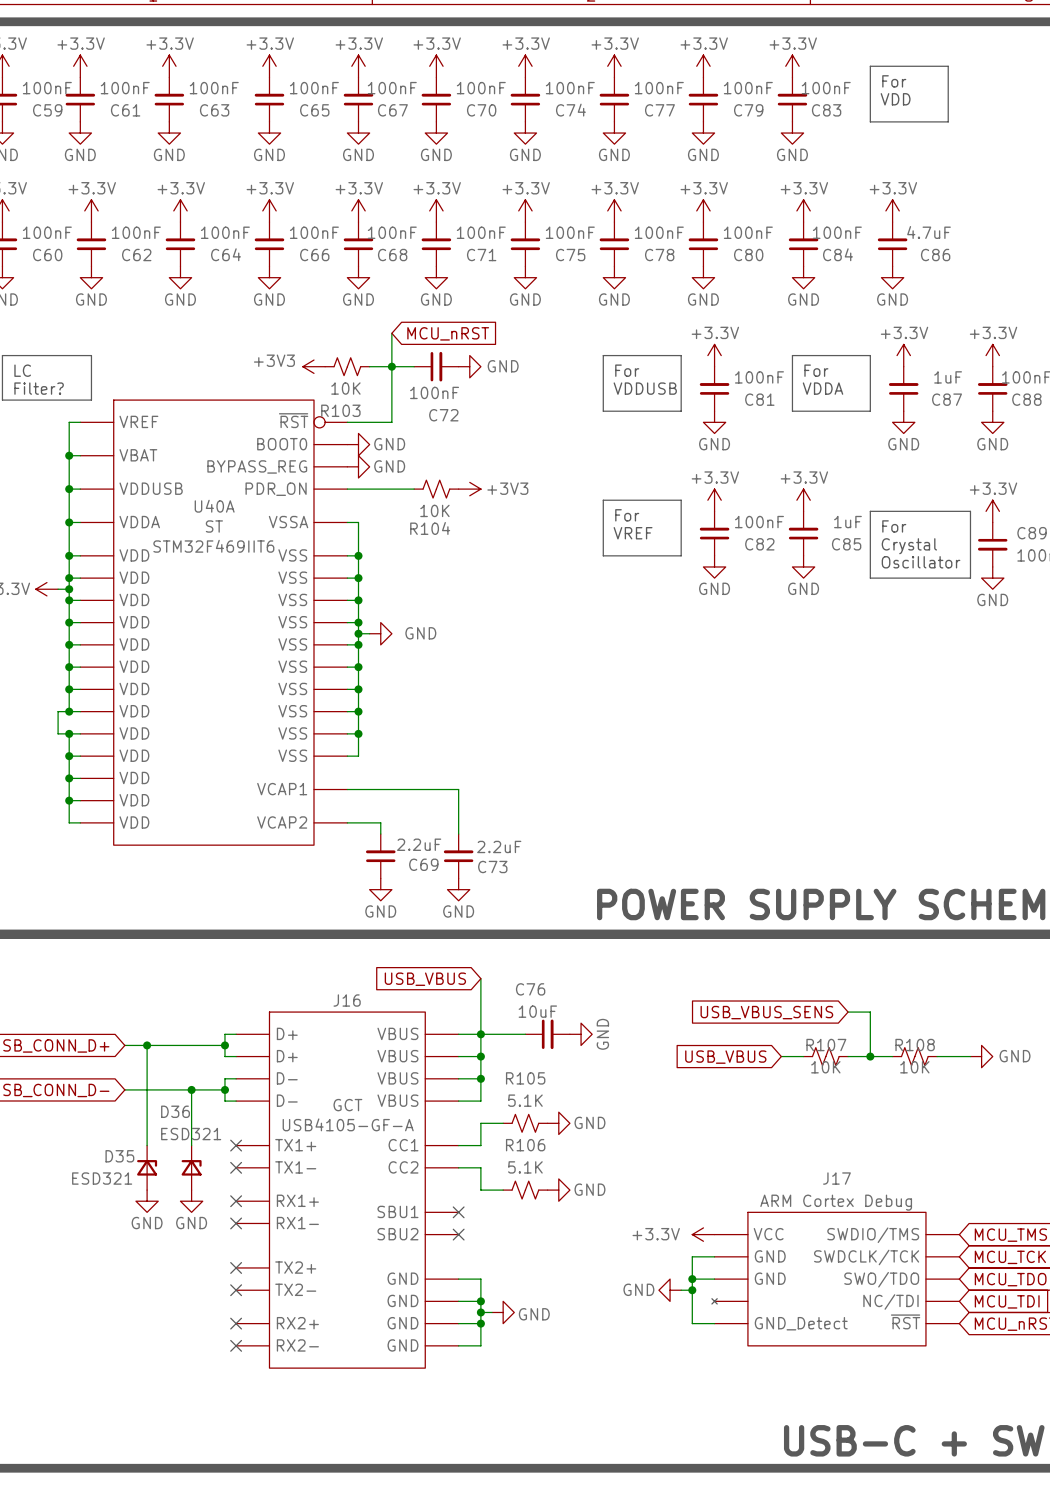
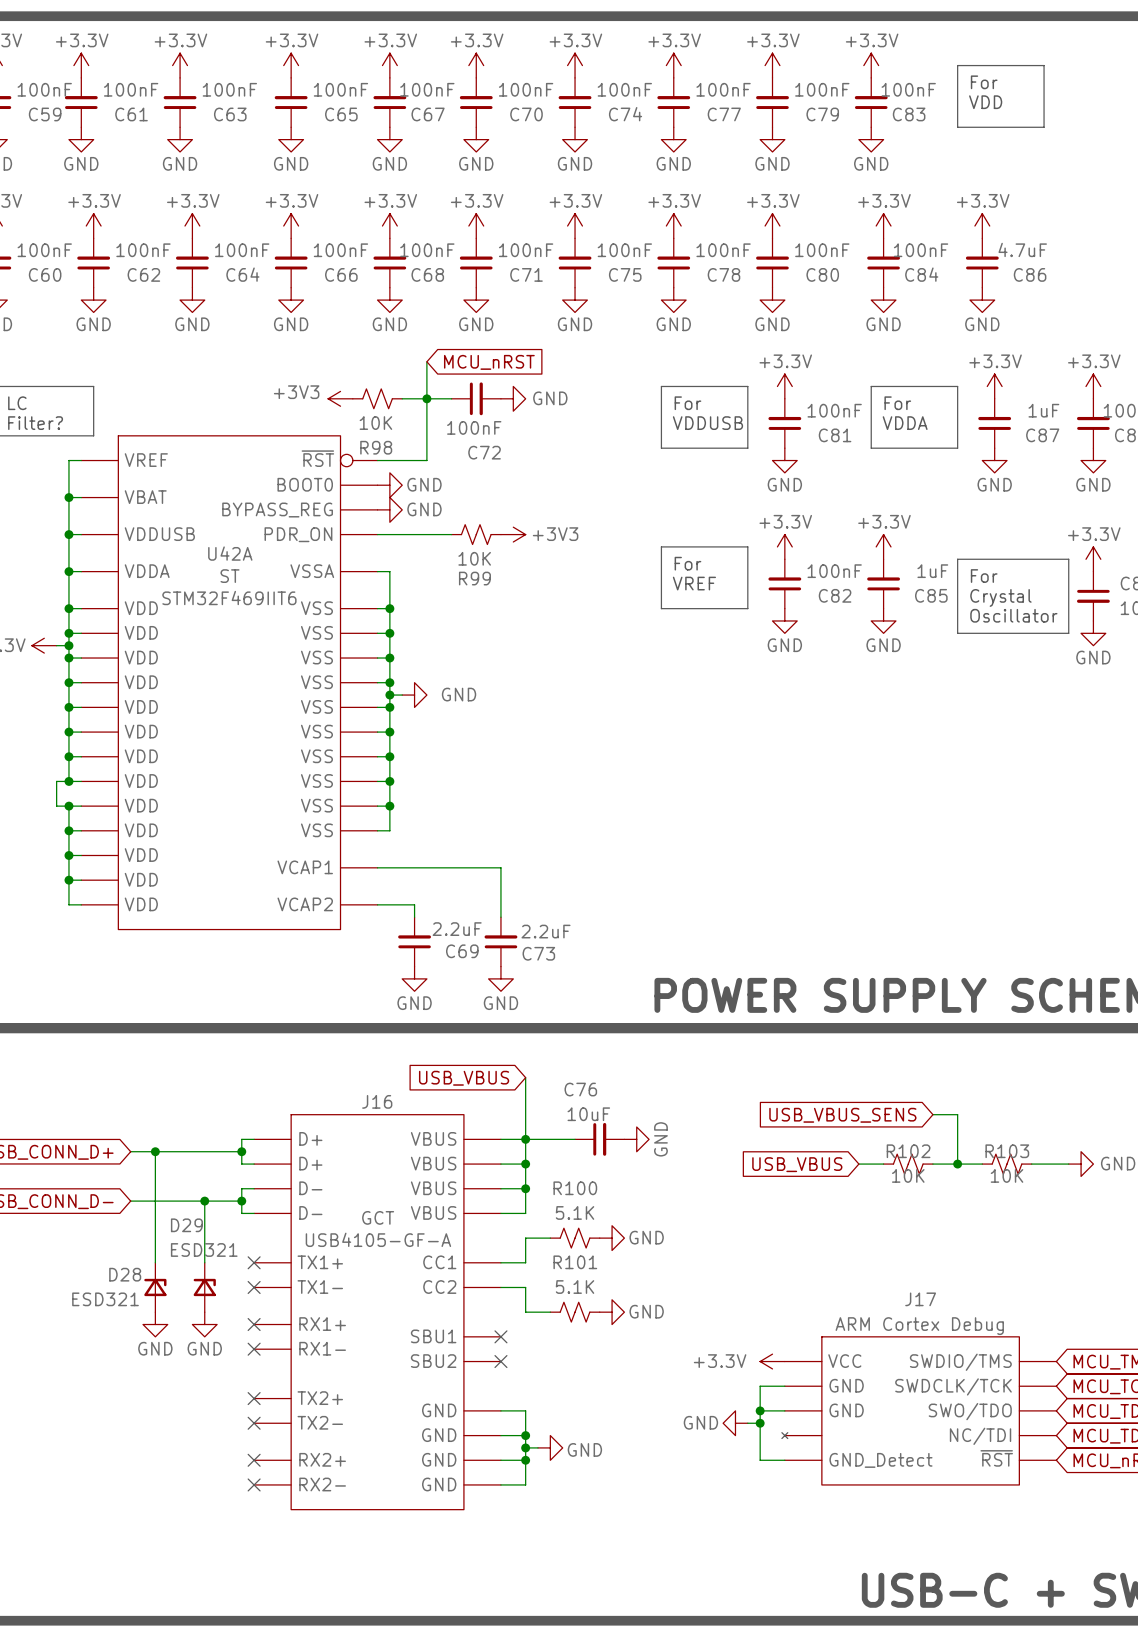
R103 name: R103 (340, 410) -> R98 (376, 447)
U40A name: U40A (214, 506) -> U42A (230, 553)
R104 name: R104 (430, 528) -> R99 (474, 578)
R107 name: R107 (826, 1045) -> R102 (908, 1151)
R108 name: R108 (915, 1045) -> R103 (1007, 1151)
R105 name: R105 (525, 1078) -> R100 (575, 1188)
D36 name: D36 (175, 1111) -> D29 (186, 1225)
R106 name: R106 (525, 1145) -> R101 (575, 1262)
D35 name: D35 (119, 1156) -> D28 (125, 1274)

